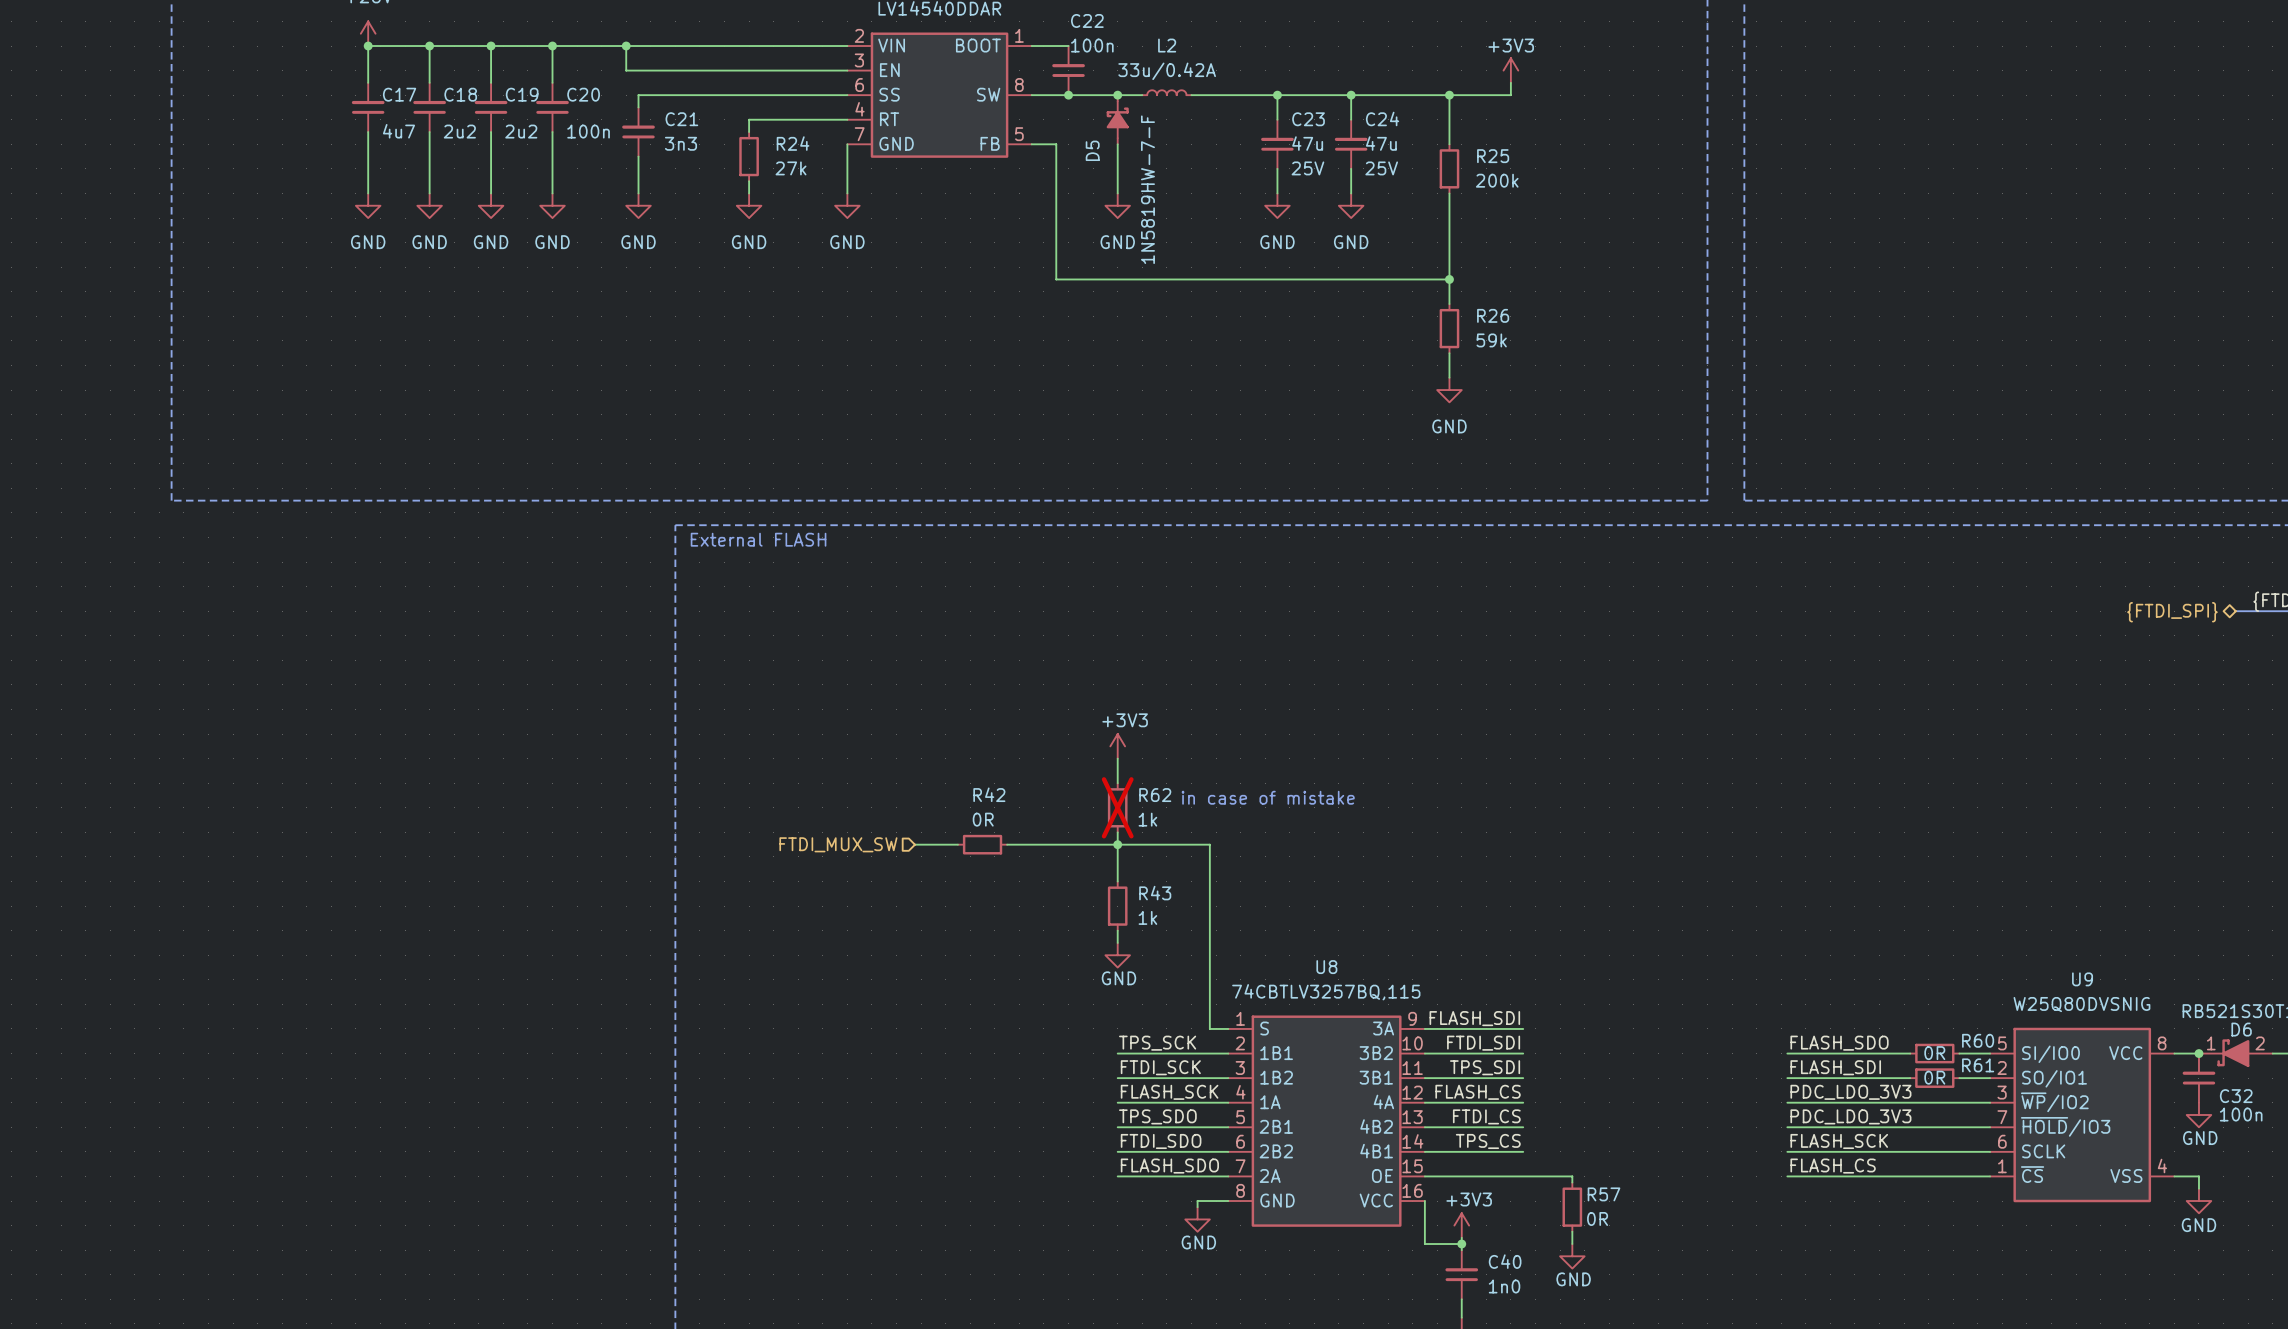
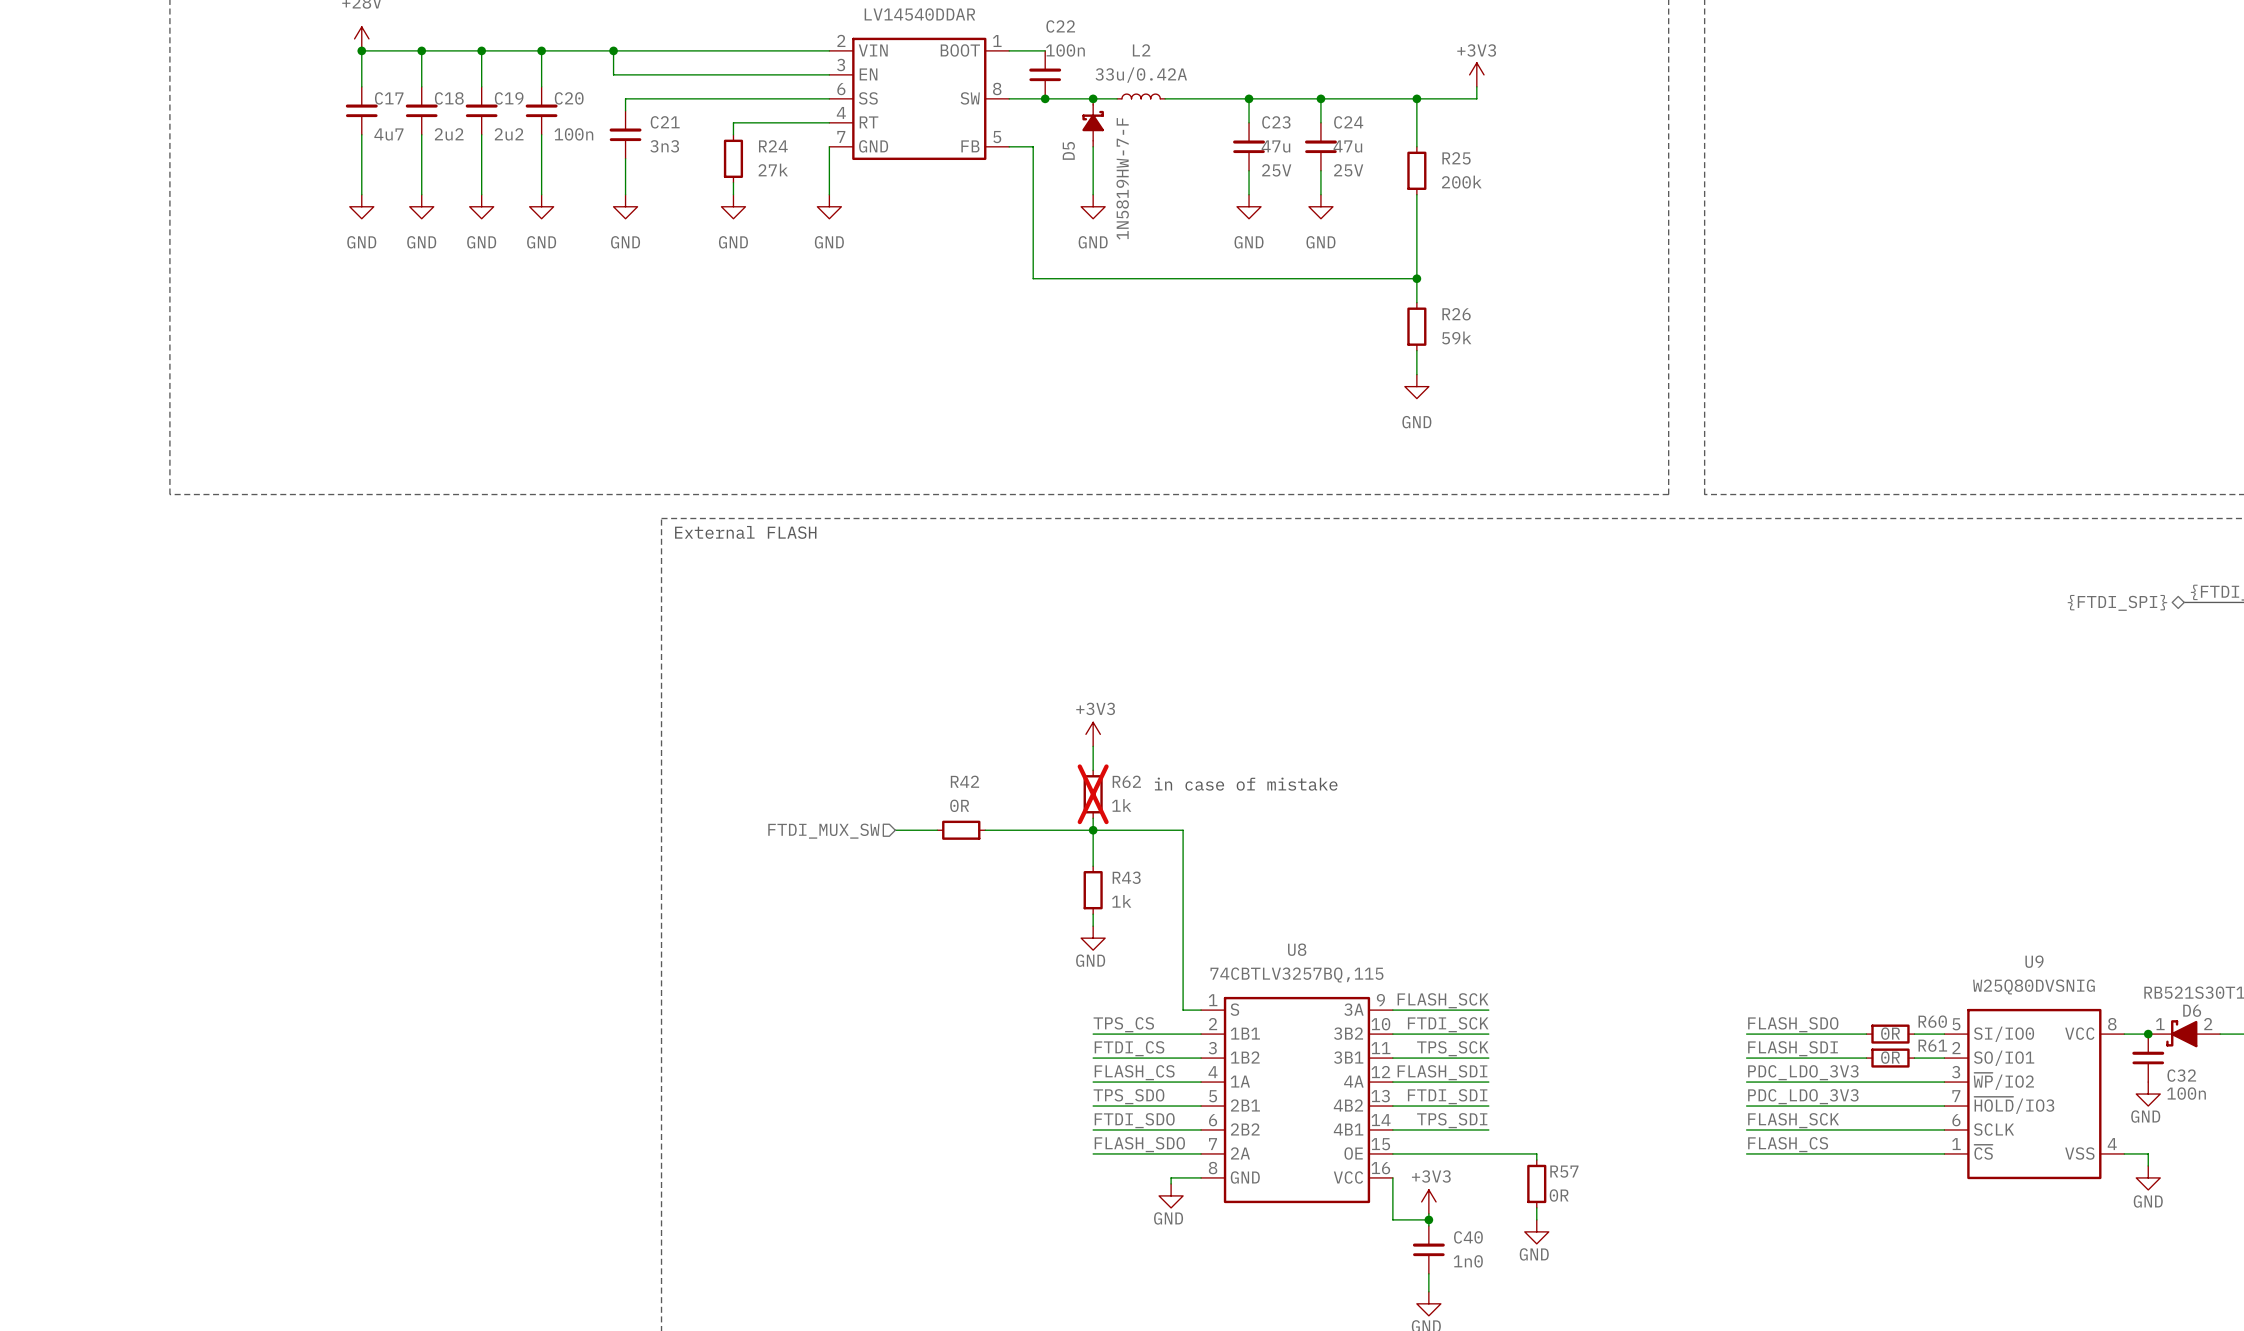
label: FLASH_SDI (1474, 1018) -> FLASH_SCK (1443, 1000)
label: TPS_SCK (1157, 1043) -> TPS_CS (1123, 1024)
label: FTDI_SDI (1483, 1043) -> FTDI_SCK (1448, 1024)
label: FTDI_SCK (1160, 1067) -> FTDI_CS (1129, 1048)
label: TPS_SDI (1485, 1067) -> TPS_SCK (1452, 1048)
label: FLASH_SCK (1169, 1092) -> FLASH_CS (1134, 1072)
label: FLASH_CS (1478, 1092) -> FLASH_SDI (1442, 1072)
label: FTDI_CS (1486, 1116) -> FTDI_SDI (1447, 1096)
label: TPS_CS (1488, 1141) -> TPS_SDI (1452, 1120)

